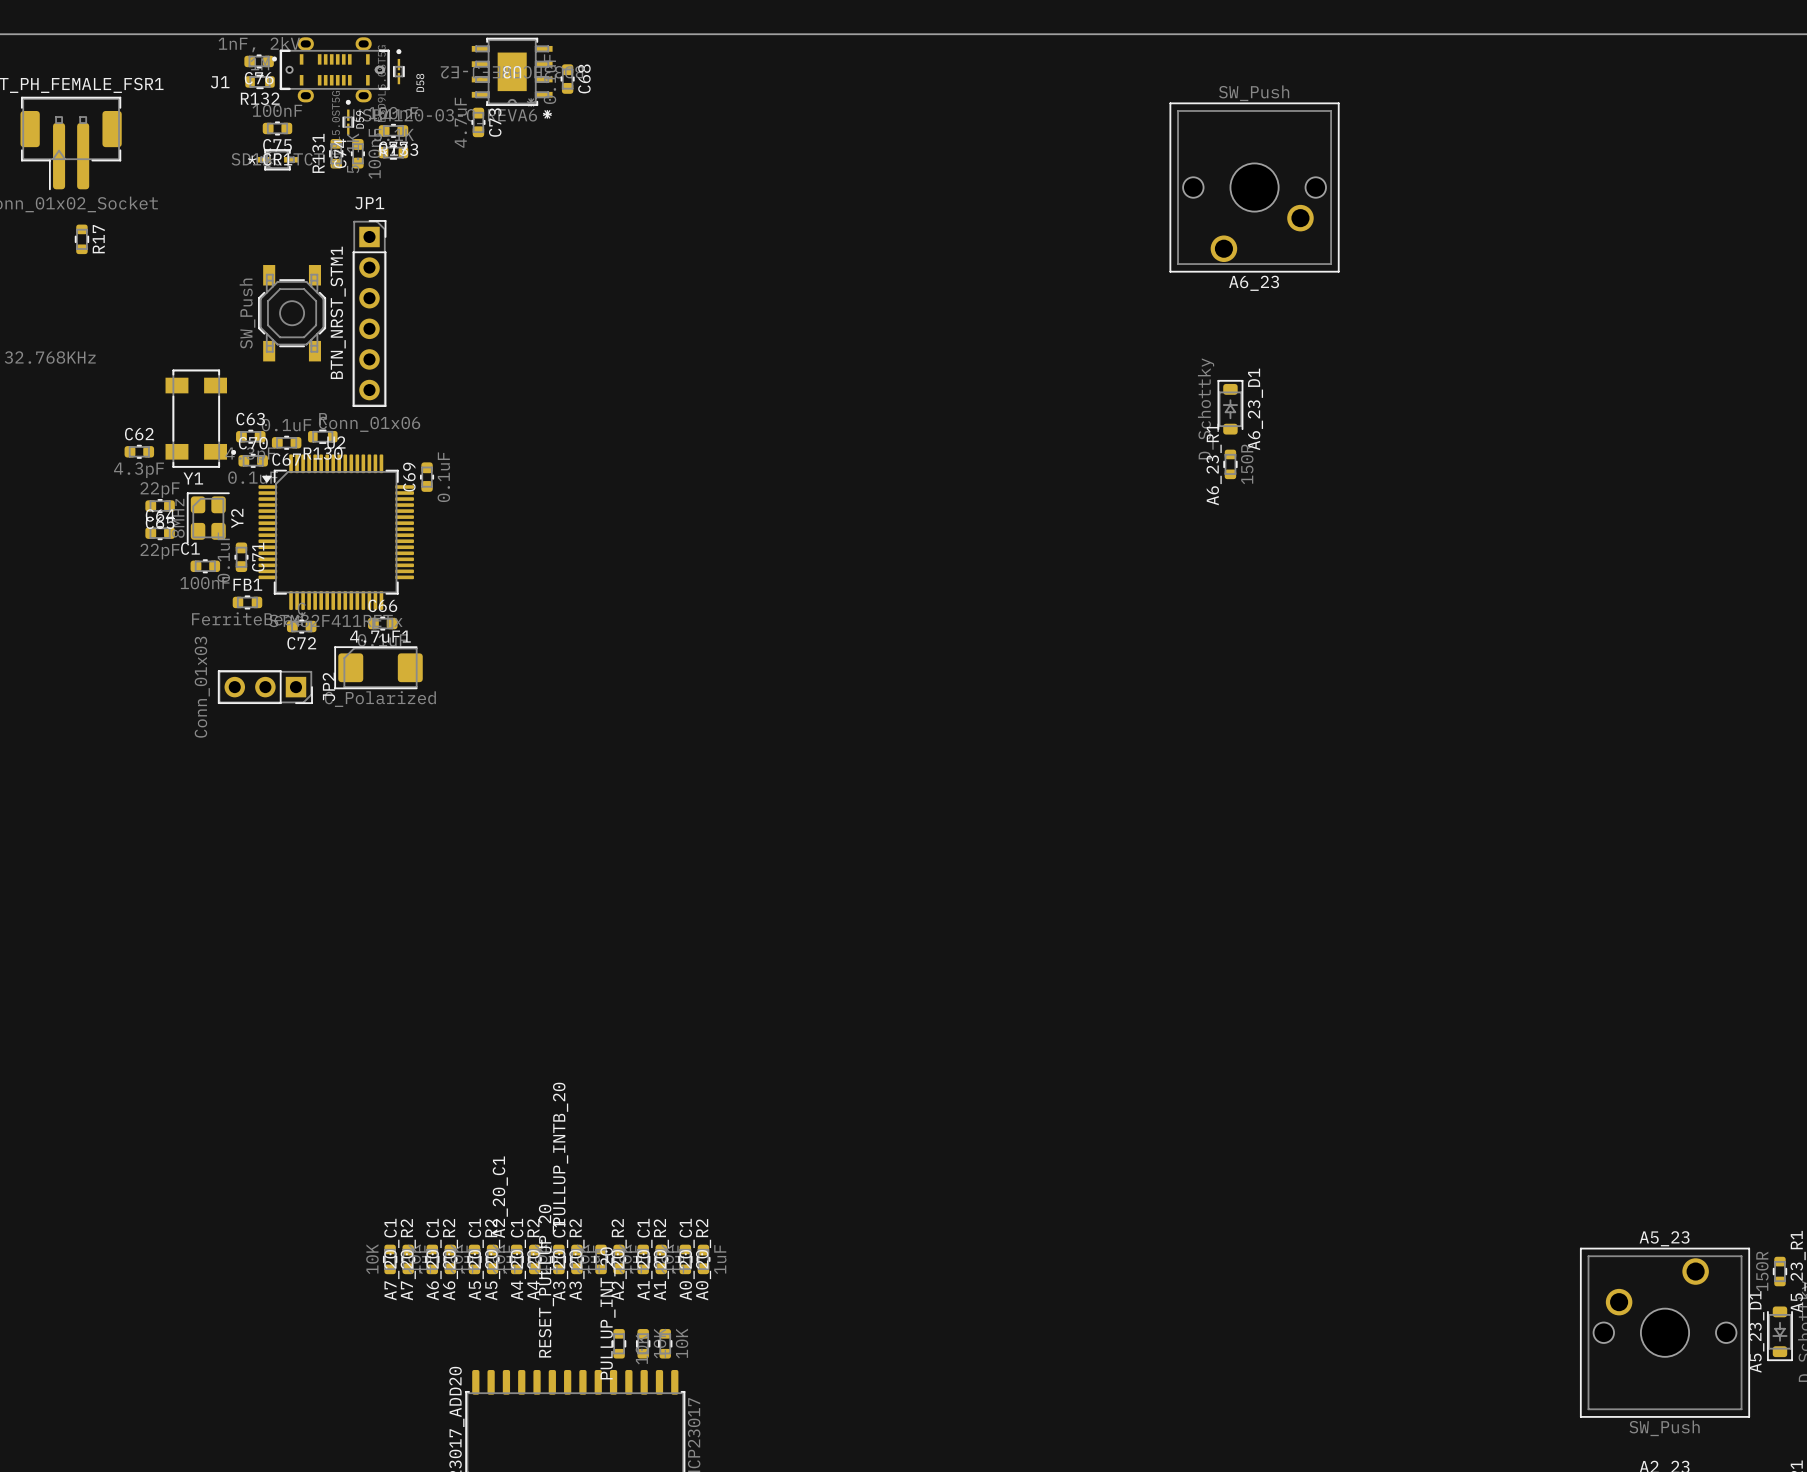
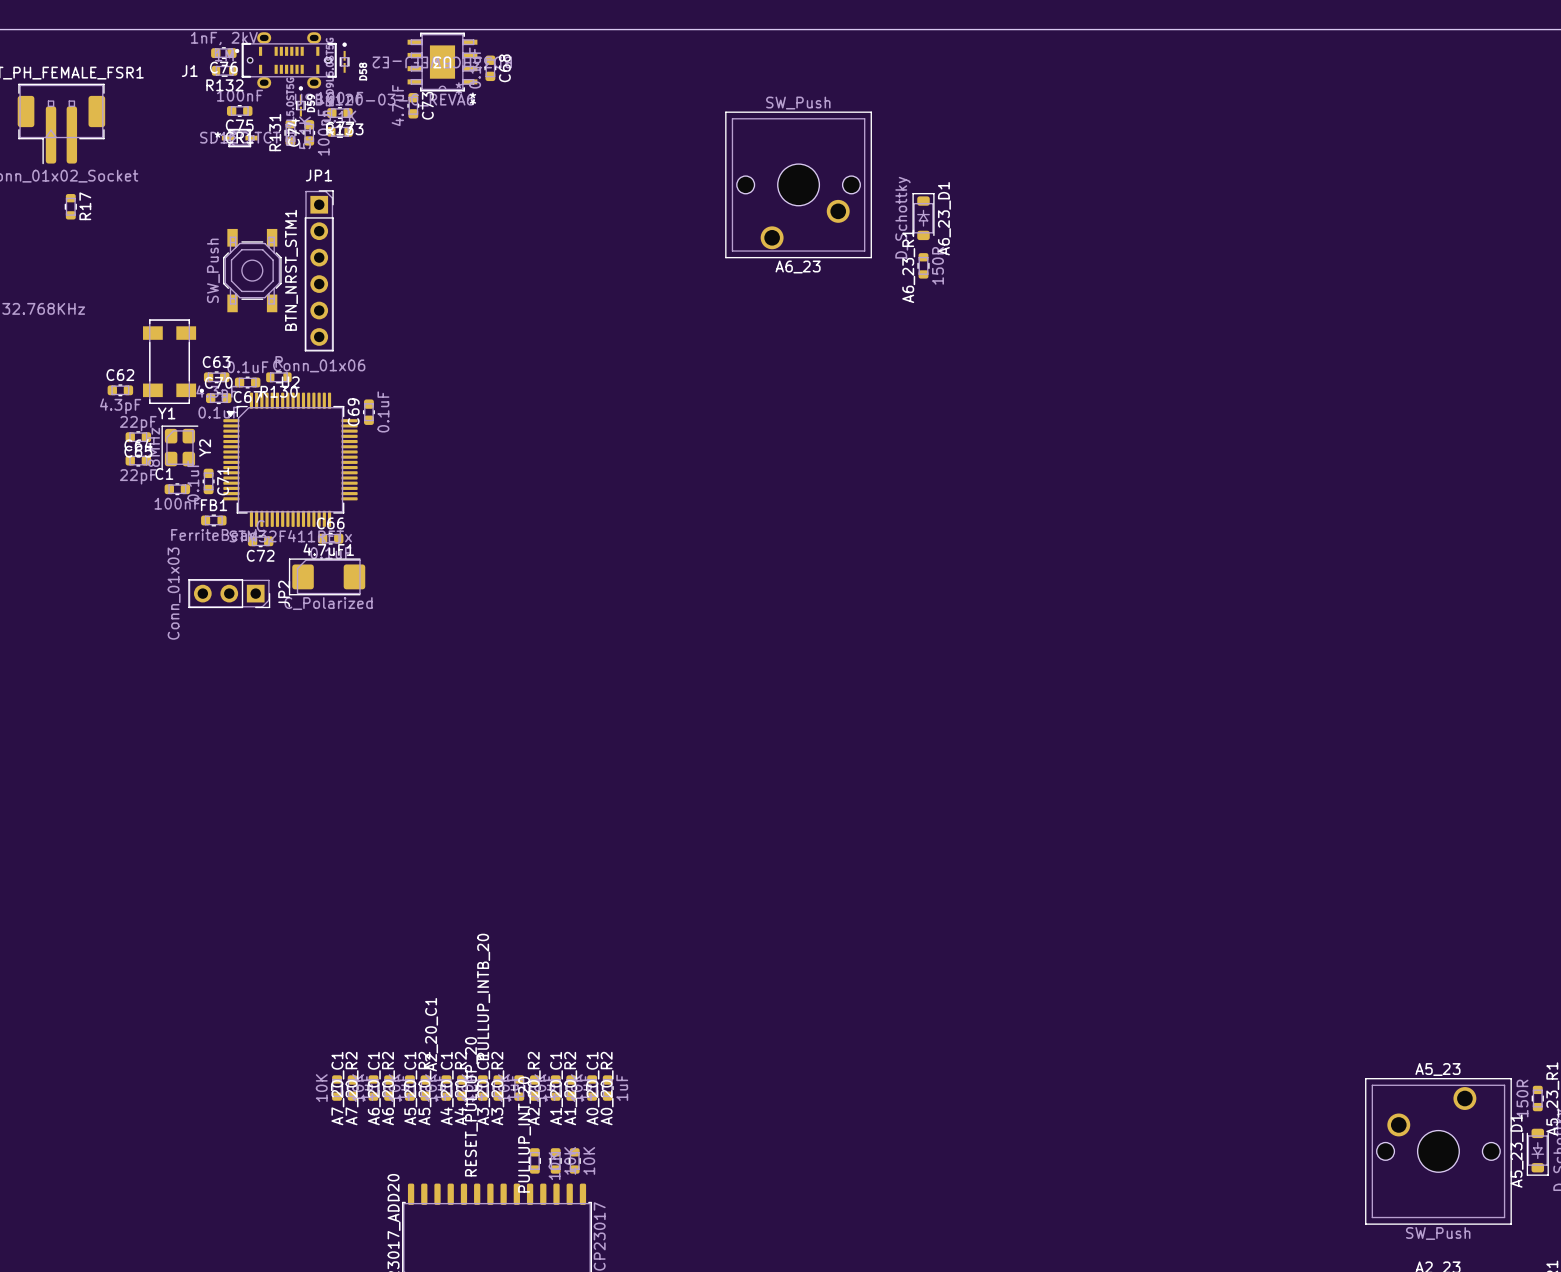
A6_23 position: (1254, 187) -> (798, 184)
A6_23_D1 position: (1230, 407) -> (923, 216)
A6_23_R1 position: (1230, 464) -> (923, 265)

